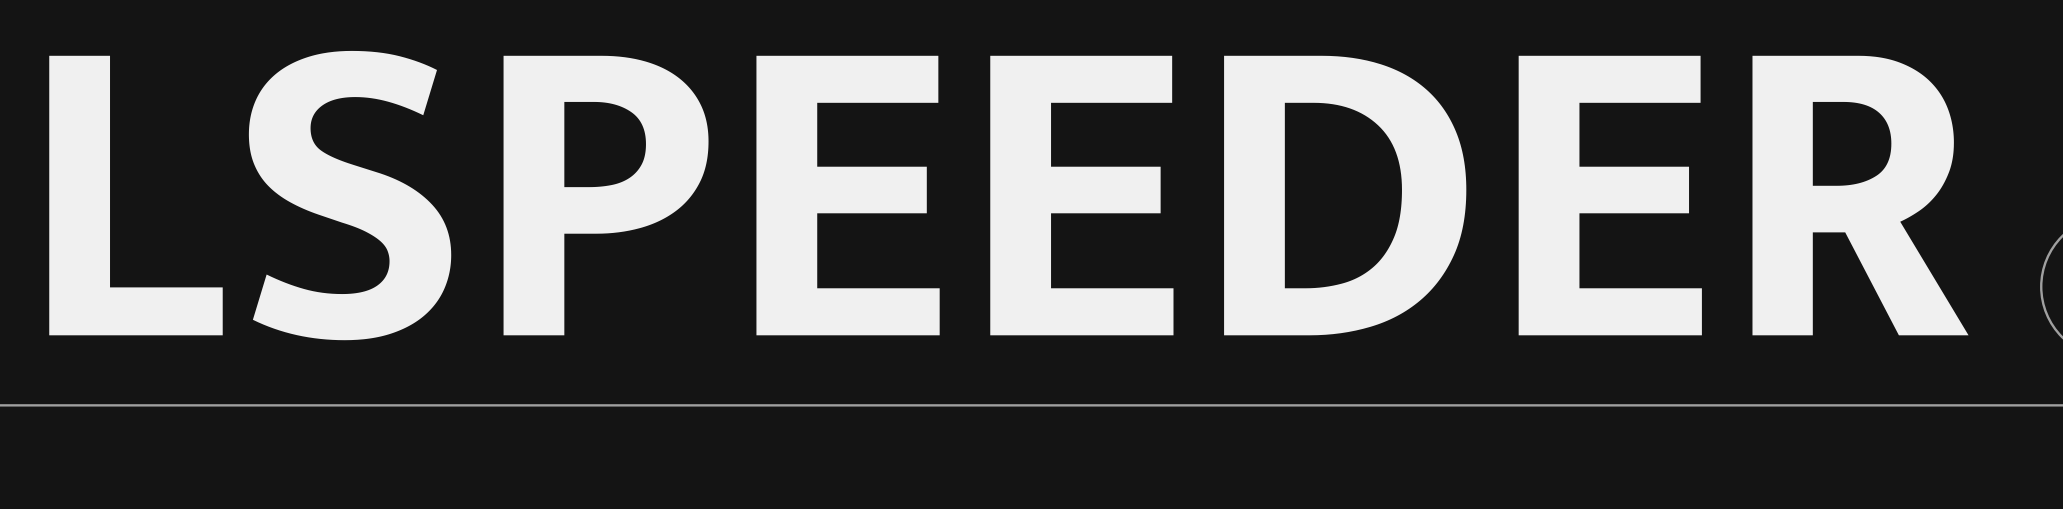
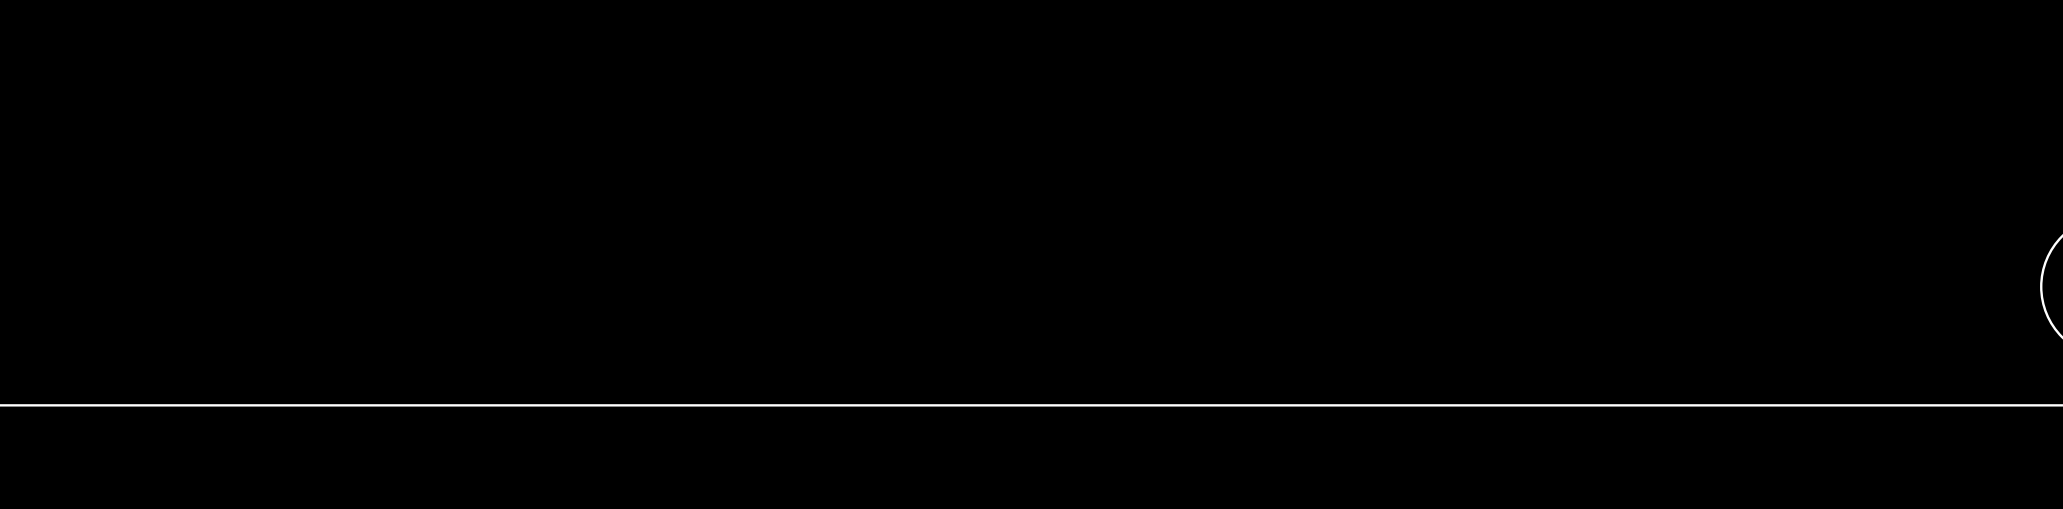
drawing: [49, 50, 1969, 341] -> none

